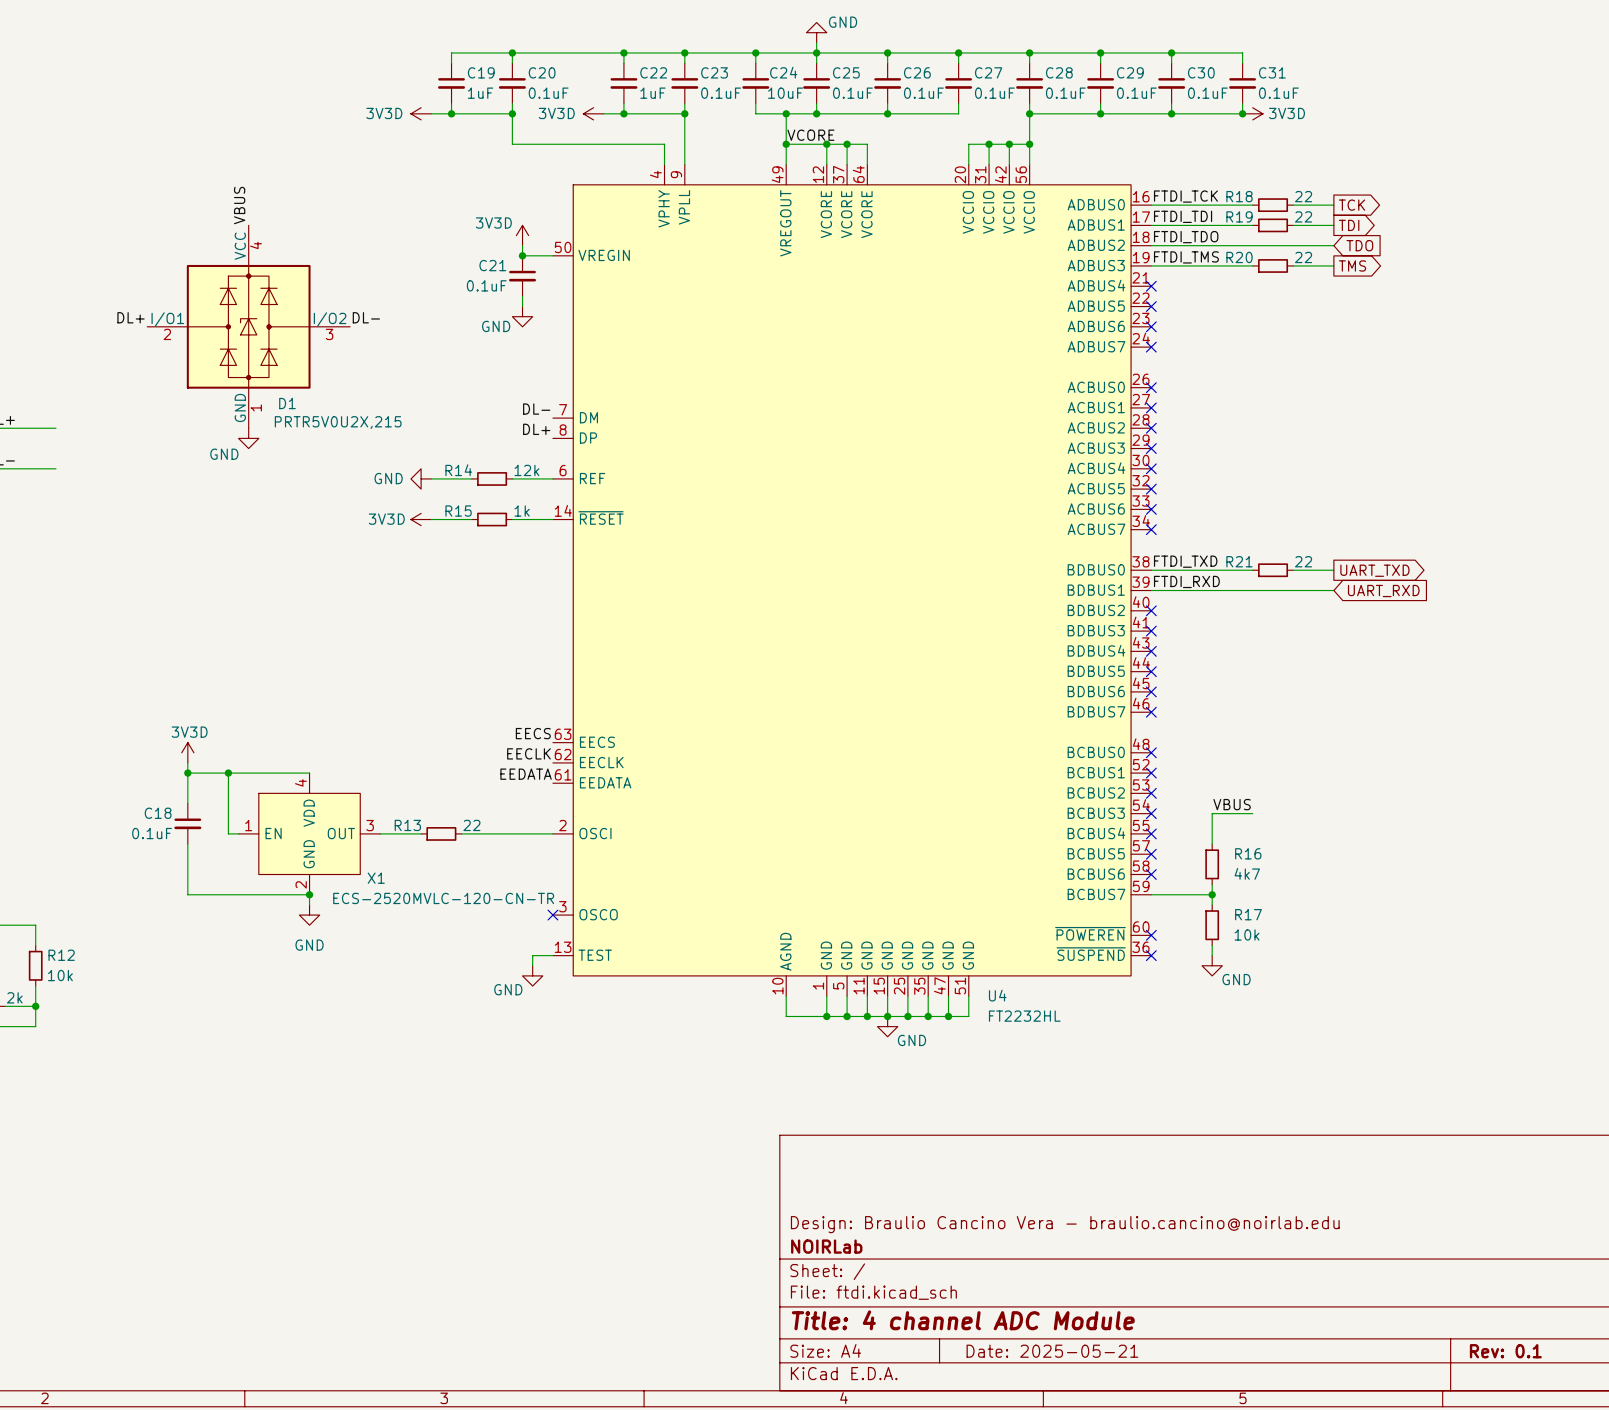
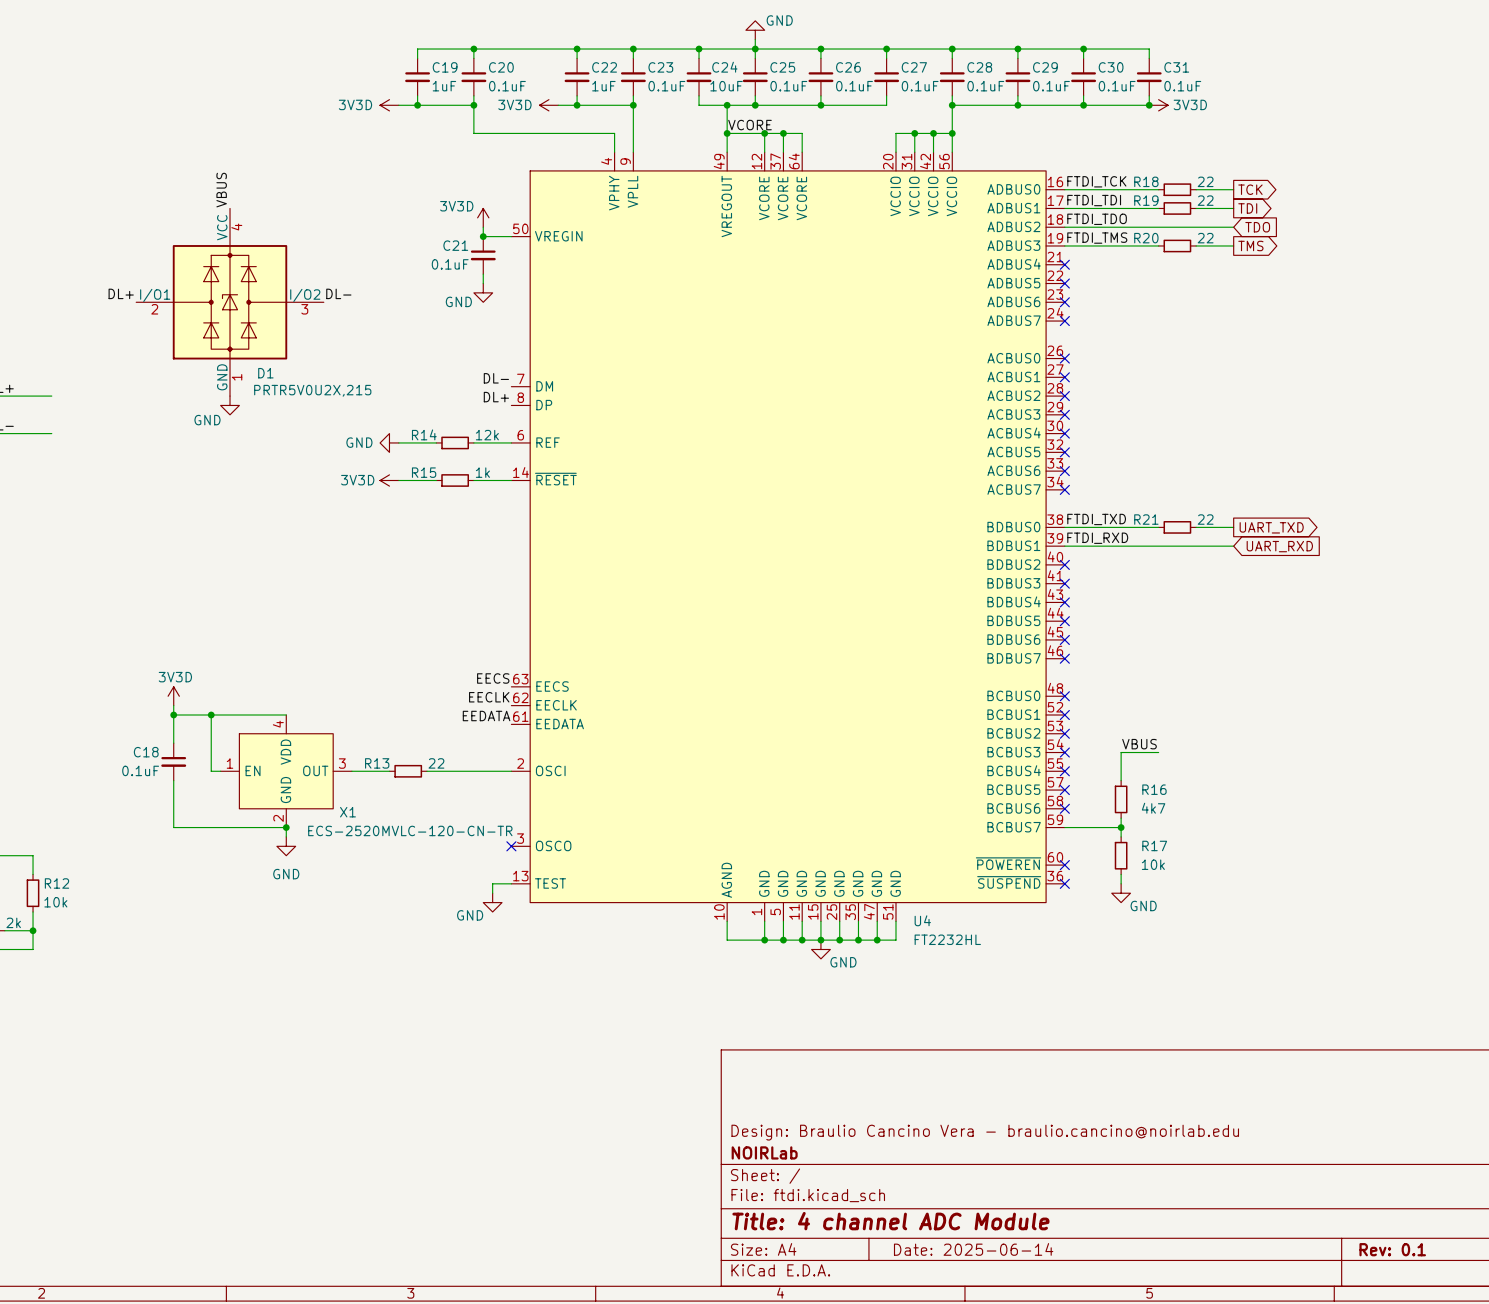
title block: Date: 2025-05-21 (1052, 1351) -> Date: 2025-06-14 (973, 1249)

